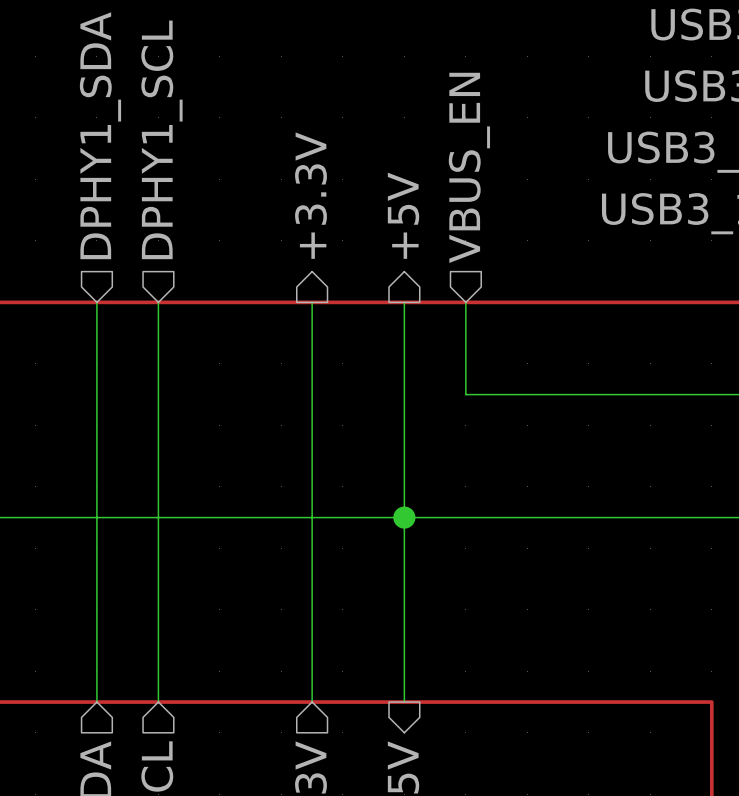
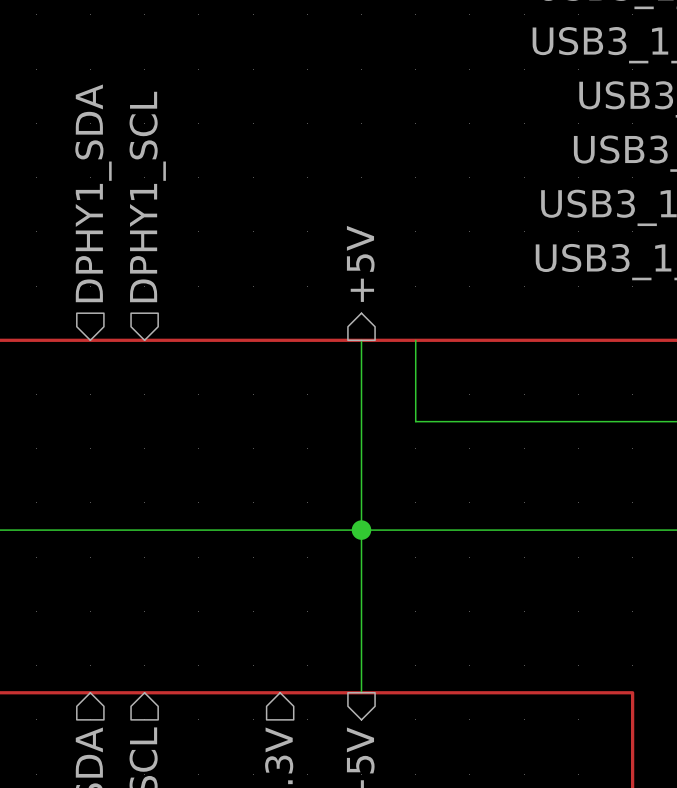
sheet pin: VBUS_EN (469, 167) -> none
sheet pin: +3.3V (311, 195) -> none
wire: (96, 302) (96, 702) -> none
wire: (158, 302) (158, 702) -> none
wire: (312, 302) (312, 702) -> none

